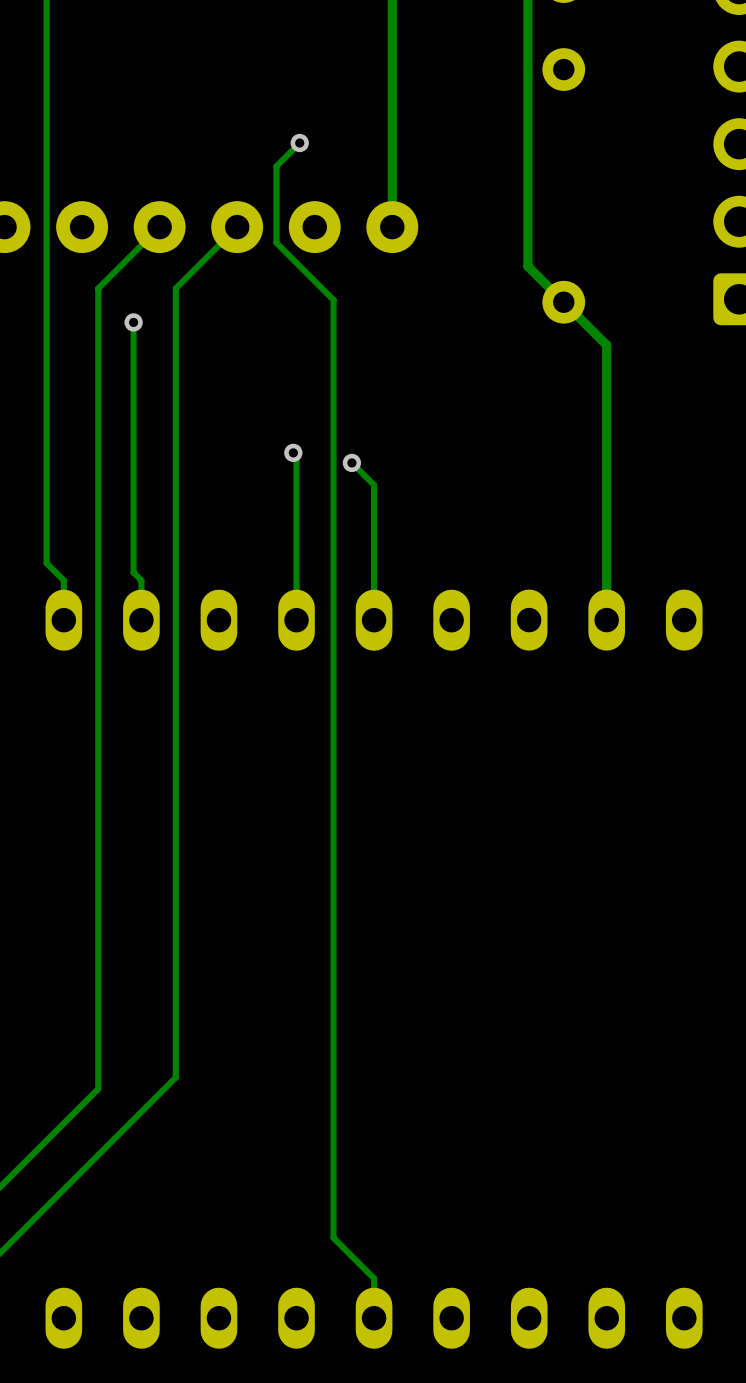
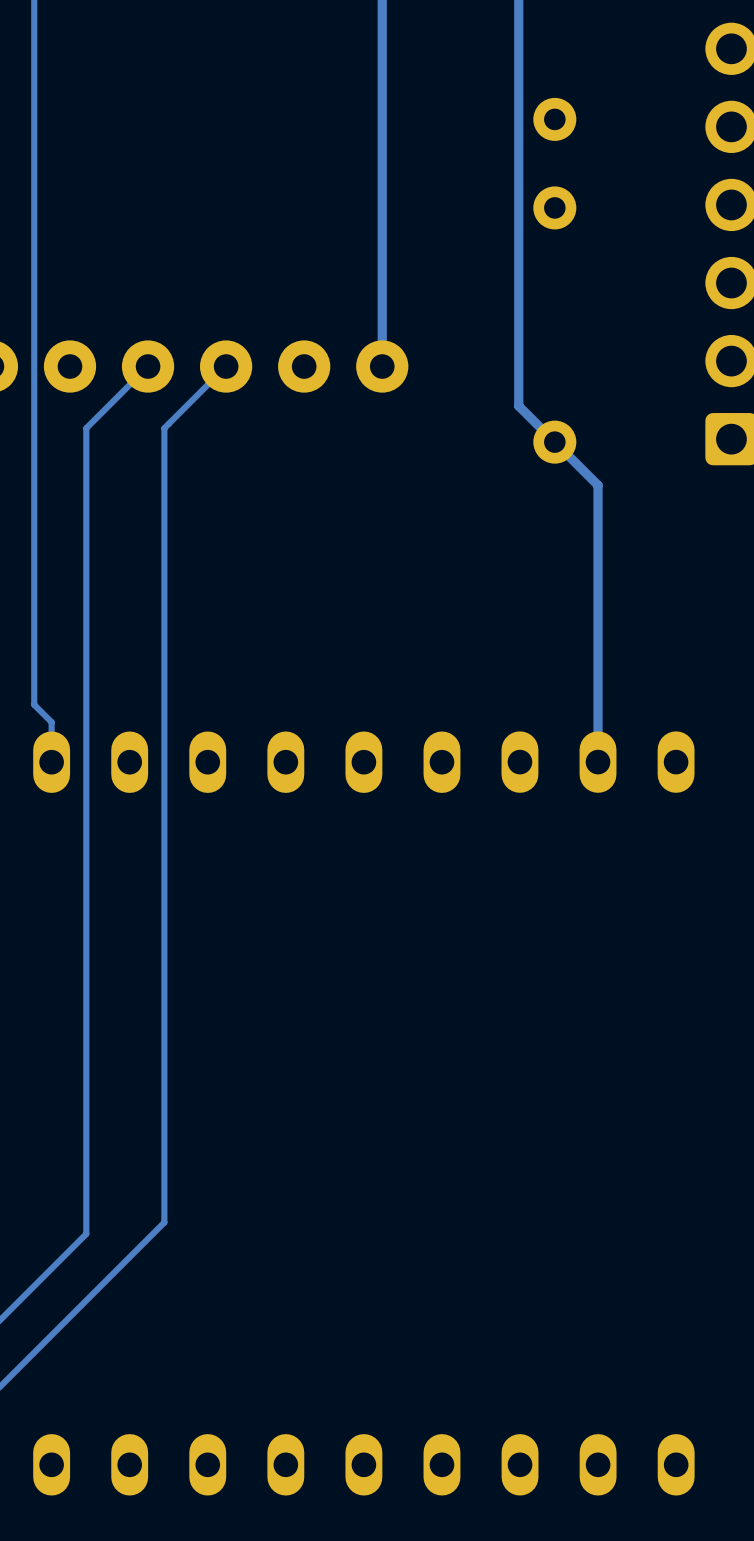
track: (299, 143) (276, 166) (276, 242) (333, 299) (333, 1237) (374, 1278) (374, 1318) -> none
via: (299, 143) -> none
track: (133, 322) (133, 572) (141, 580) (141, 620) -> none
via: (133, 322) -> none
track: (293, 452) (296, 456) (296, 620) -> none
via: (293, 452) -> none
track: (351, 462) (374, 485) (374, 620) -> none
via: (351, 462) -> none

